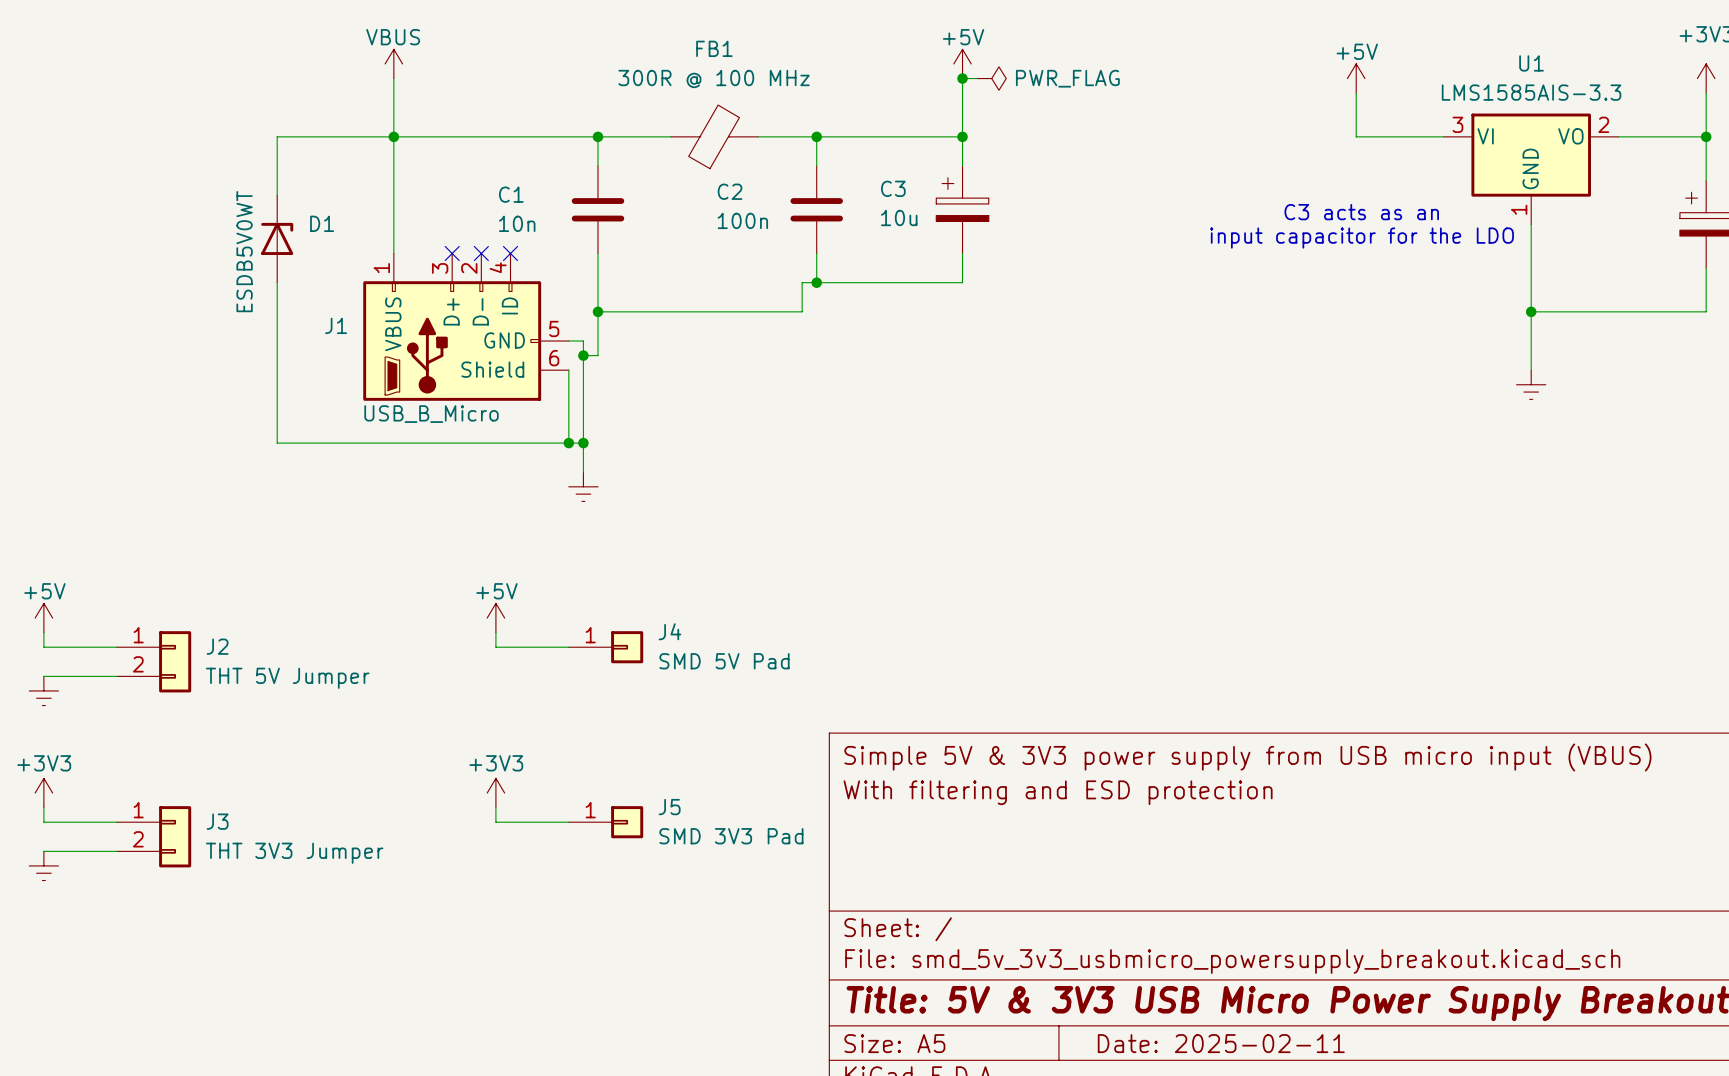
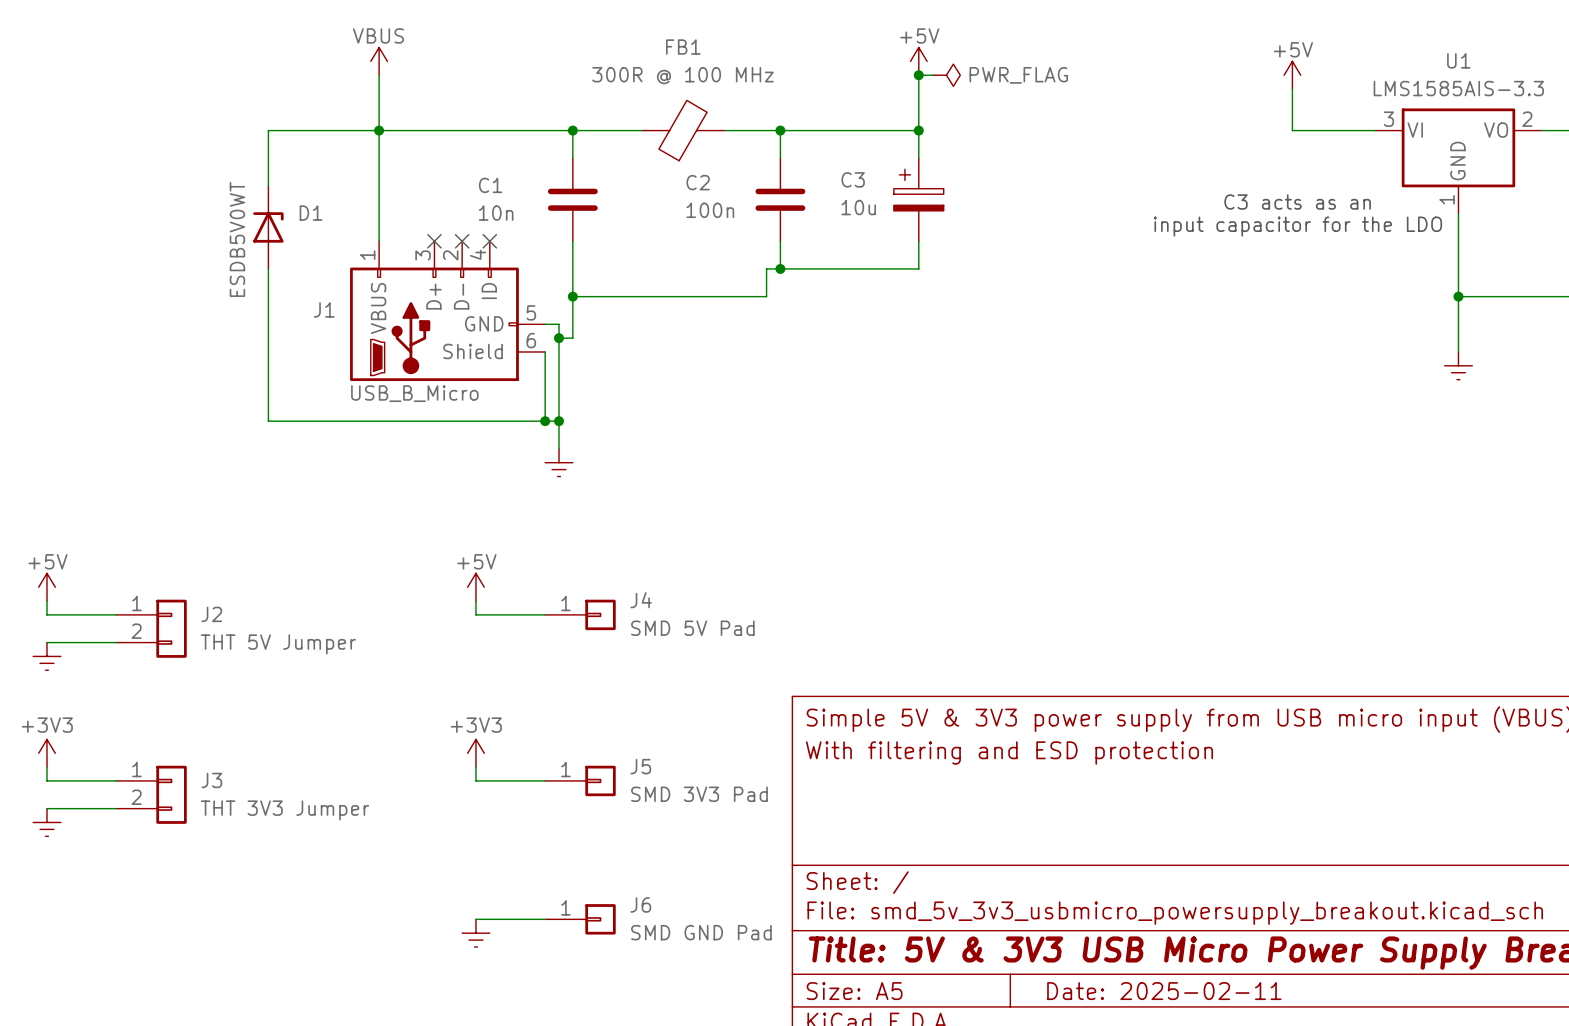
wire: none -> (475, 919) (545, 919)
J6: none -> SMD GND Pad (580, 919)
power symbol: none -> (475, 933)

